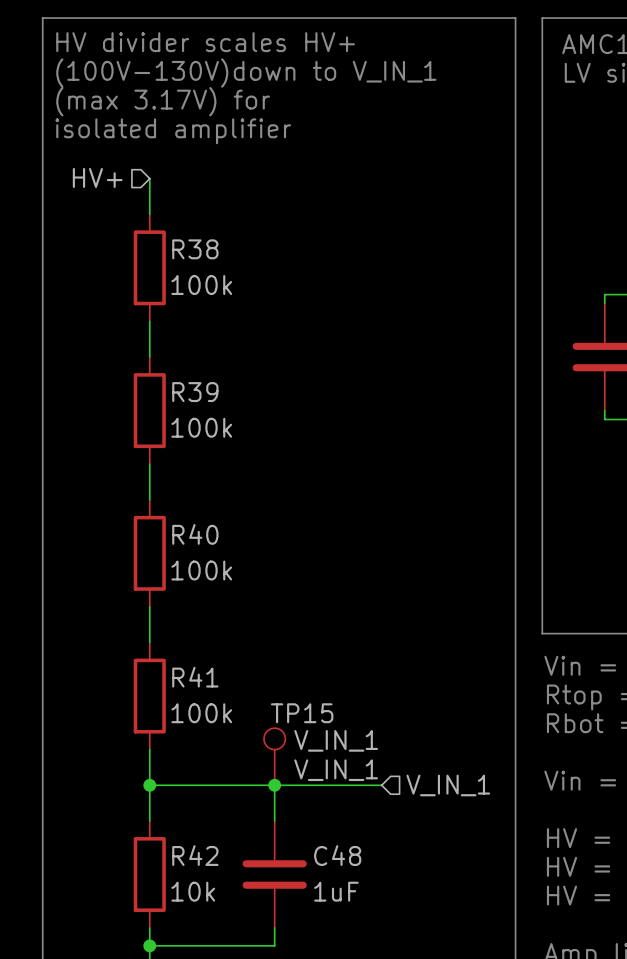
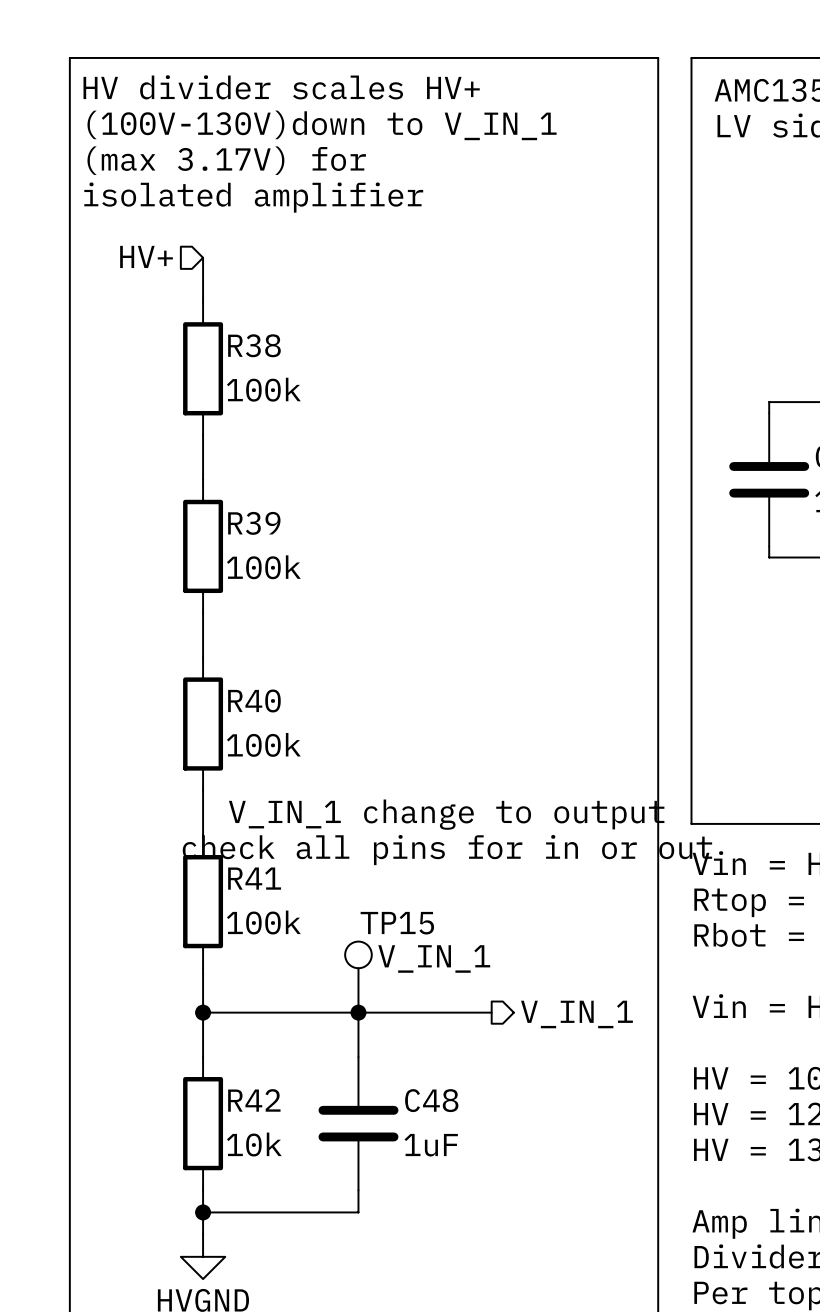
text: none -> V_IN_1 change to output (446, 814)
text: none -> check all pins for in or out (447, 850)
label: V_IN_1 (336, 770) -> none
hierarchical label shape: input (448, 785) -> output (576, 1014)

